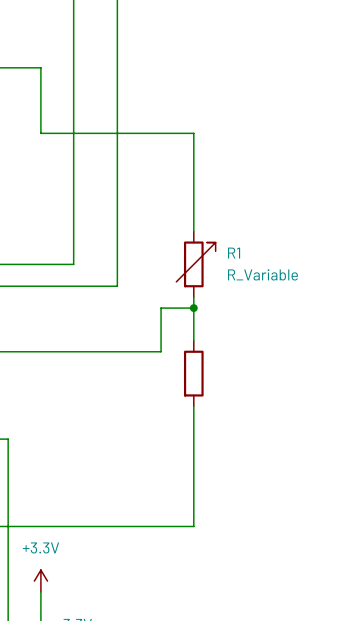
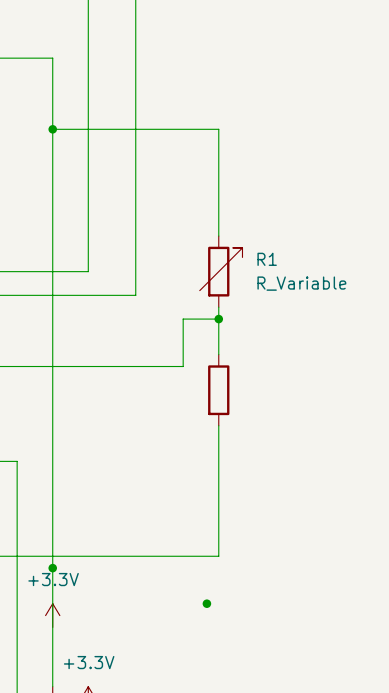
wire: none -> (52, 129) (52, 627)
junction: none -> (52, 129)
junction: none -> (52, 568)
junction: none -> (206, 603)

